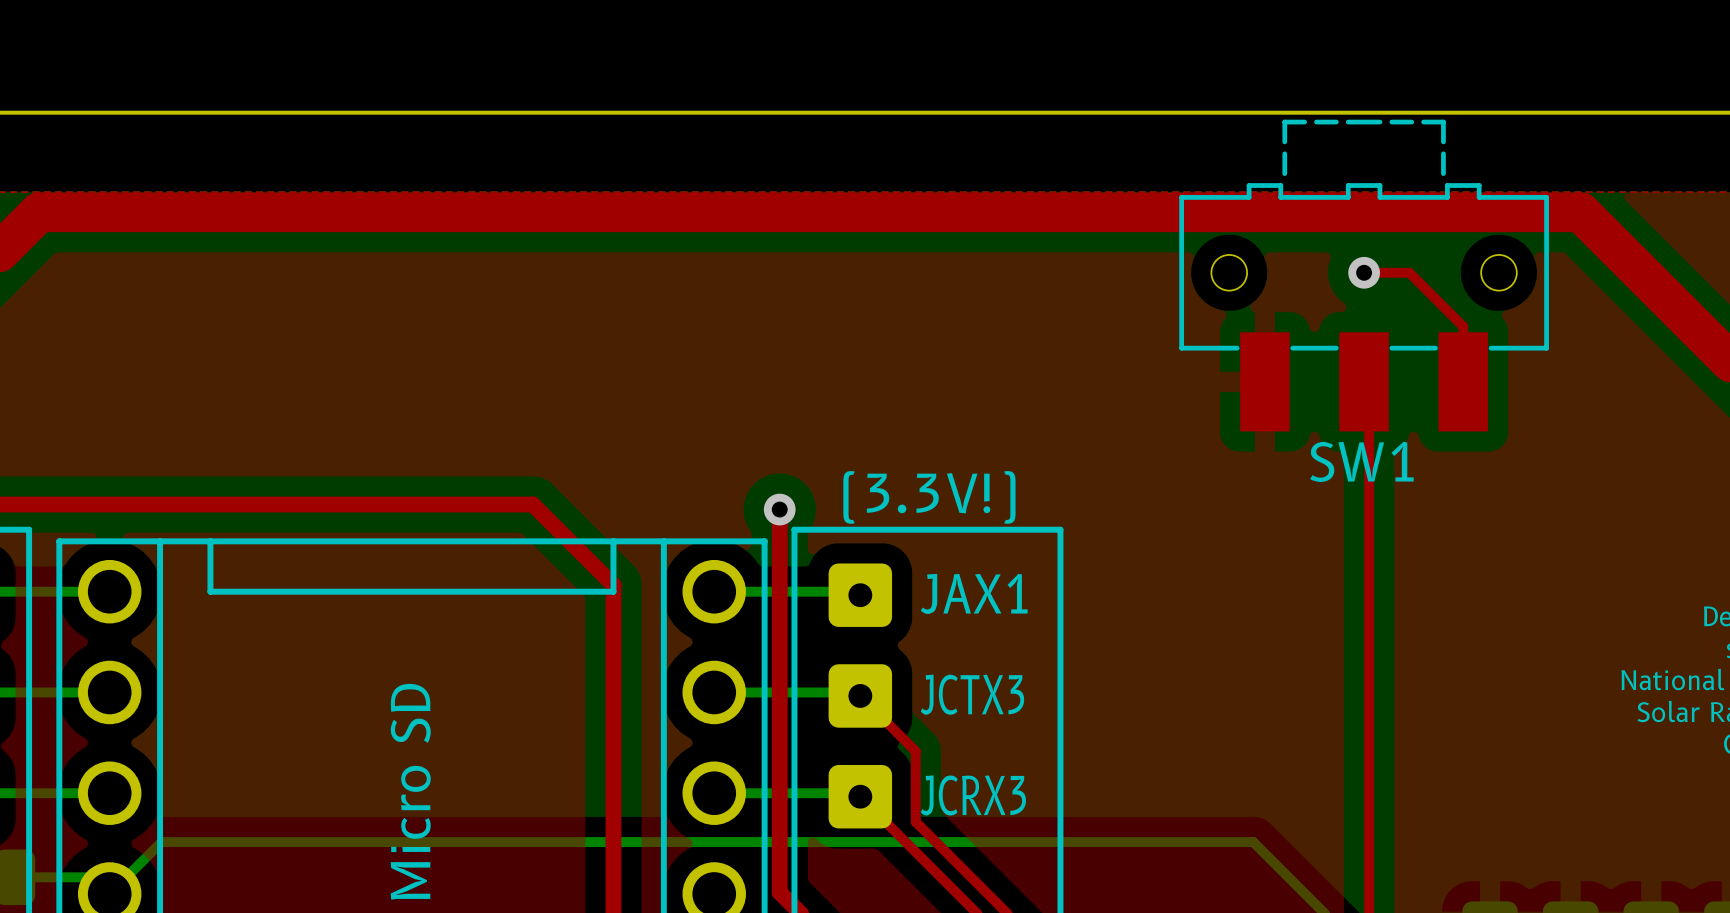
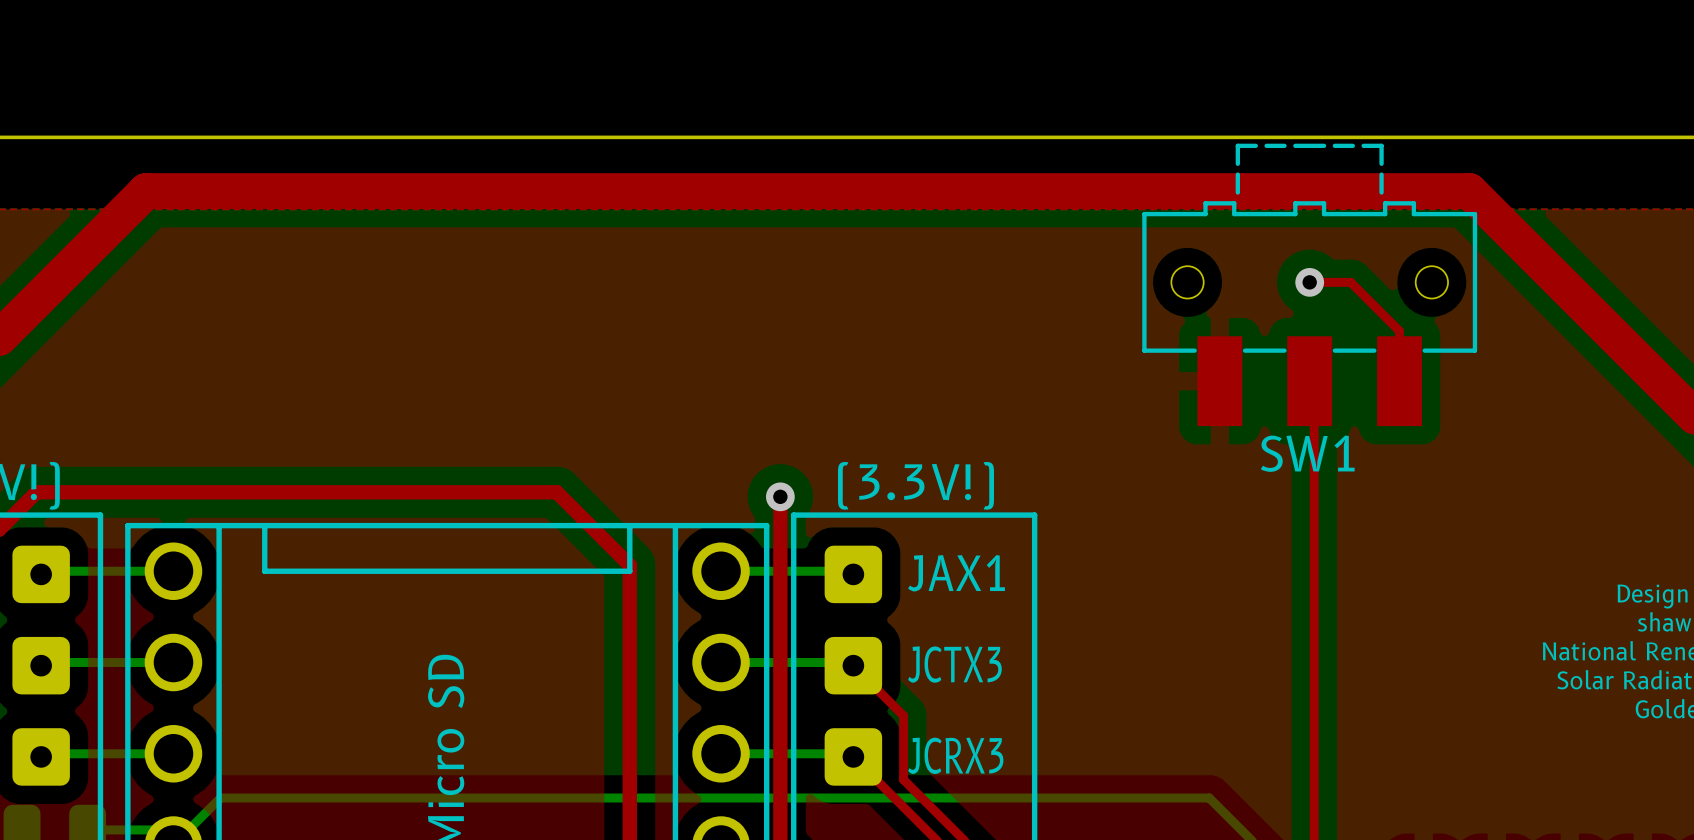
top track: (39, 212) (1580, 212) -> (109, 227) (146, 191) (1469, 191) (1505, 227)

